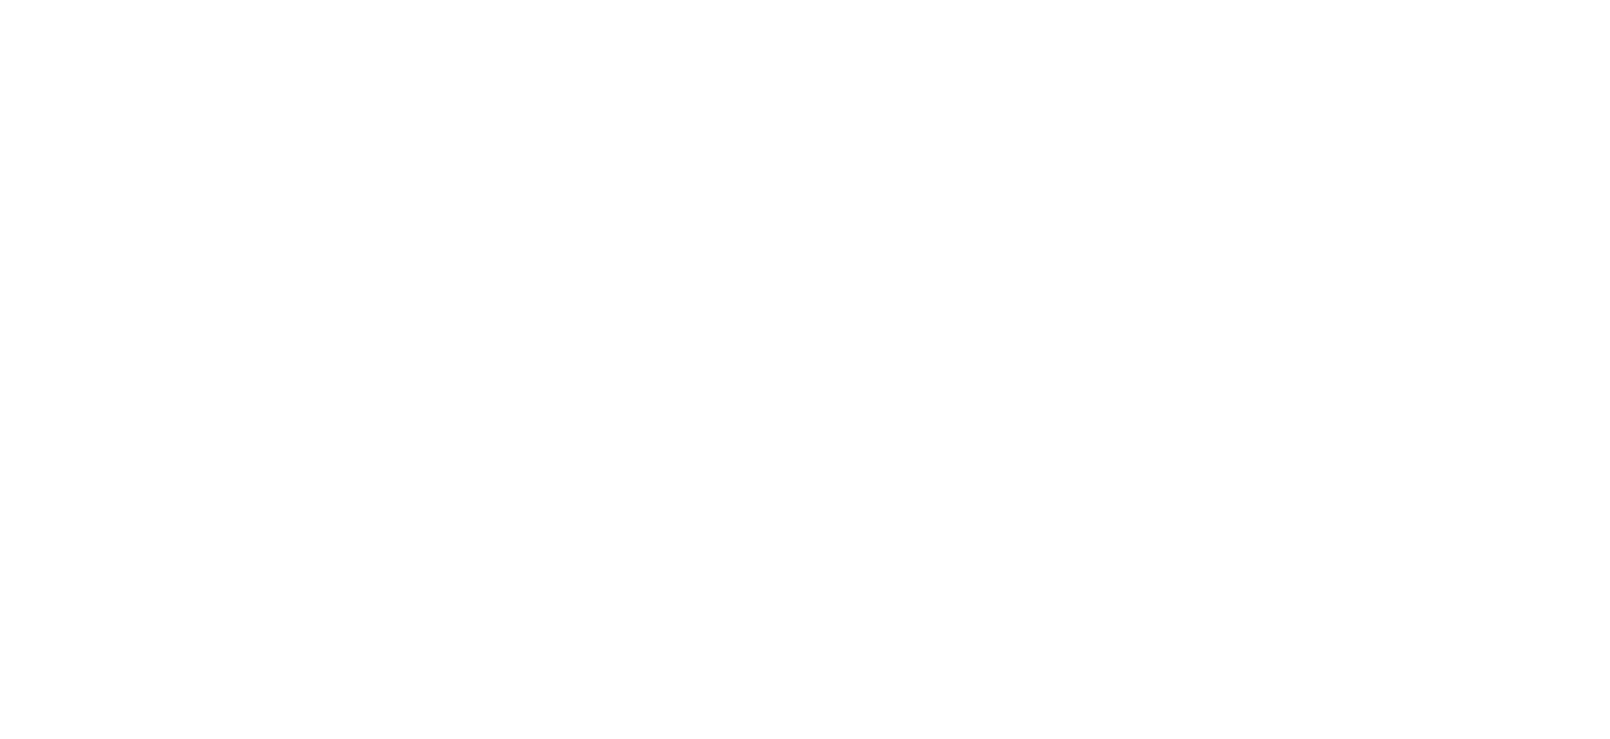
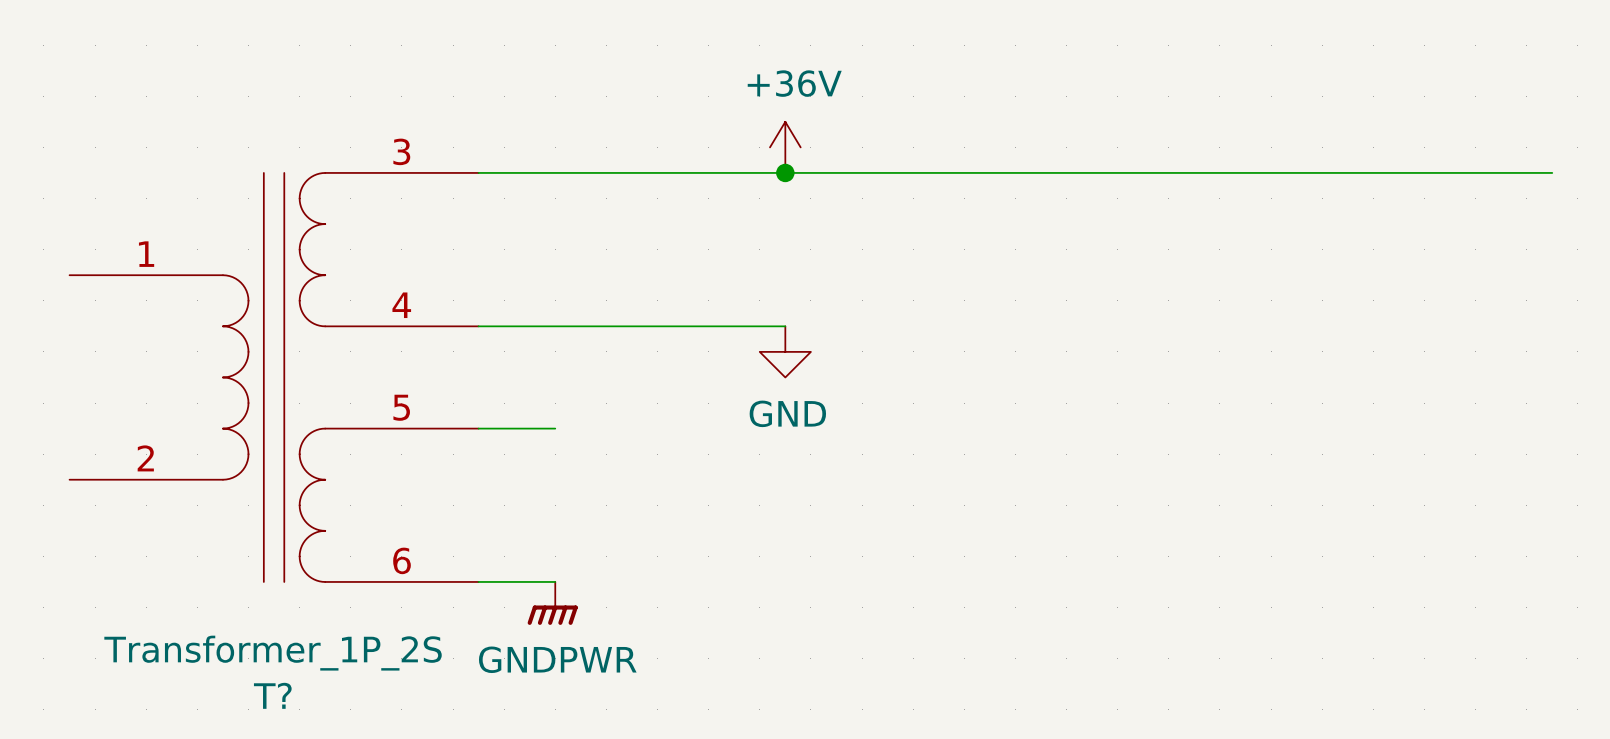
power symbol: none -> +36V (785, 147)
wire: none -> (478, 172) (1552, 172)
junction: none -> (785, 172)
wire: none -> (478, 326) (785, 326)
power symbol: none -> GND (785, 351)
T?: none -> Transformer_1P_2S (274, 377)
wire: none -> (478, 428) (555, 428)
wire: none -> (478, 581) (555, 581)
power symbol: none -> GNDPWR (552, 603)

